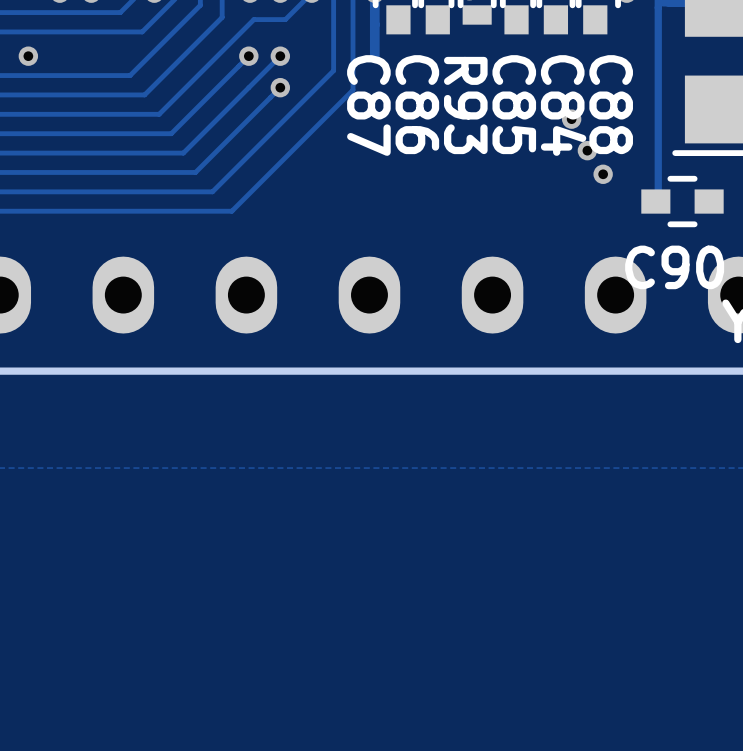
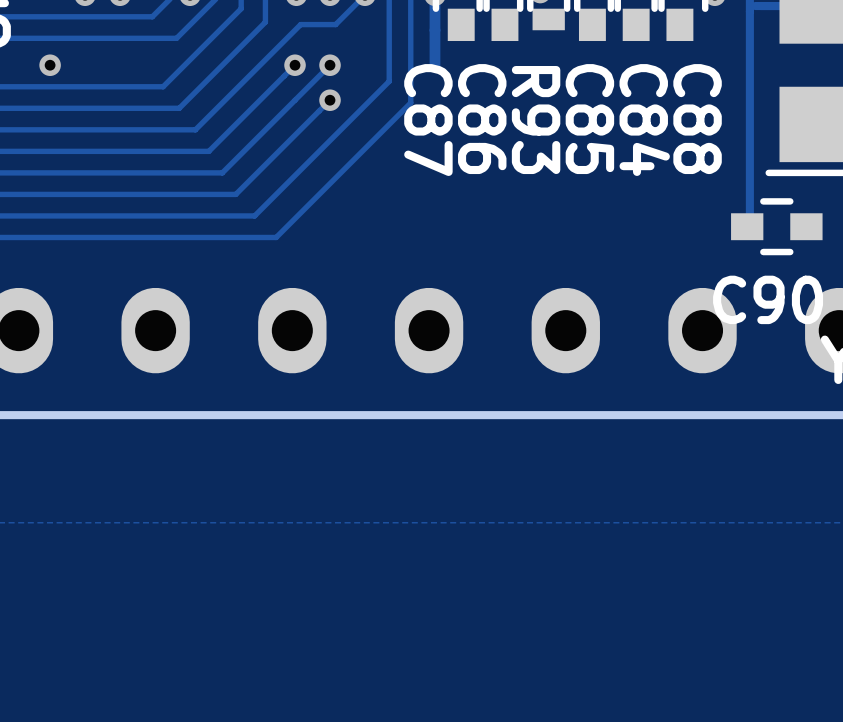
via: (571, 119) -> none
via: (587, 150) -> none
via: (603, 174) -> none

